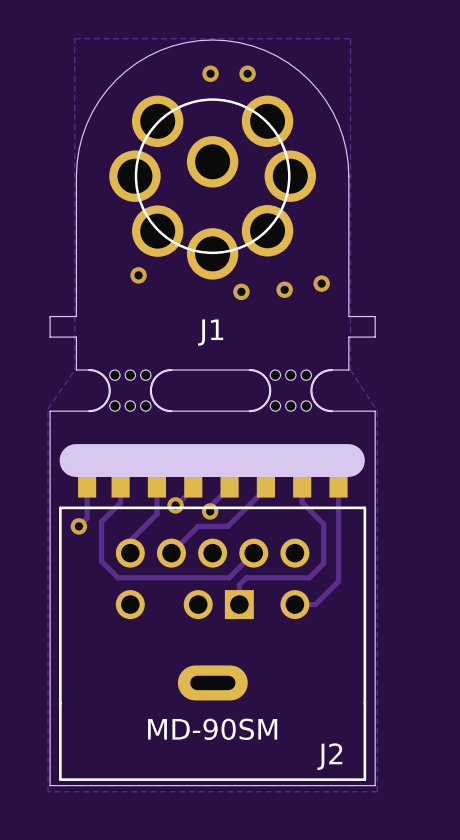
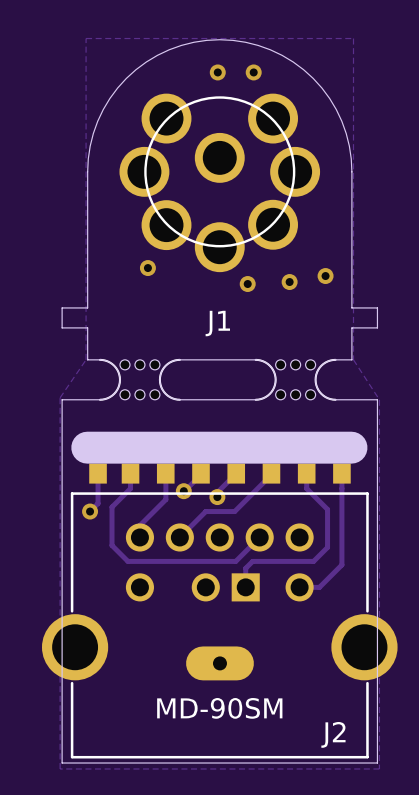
J2 footprint: [59, 506, 367, 781] -> [41, 492, 398, 759]

